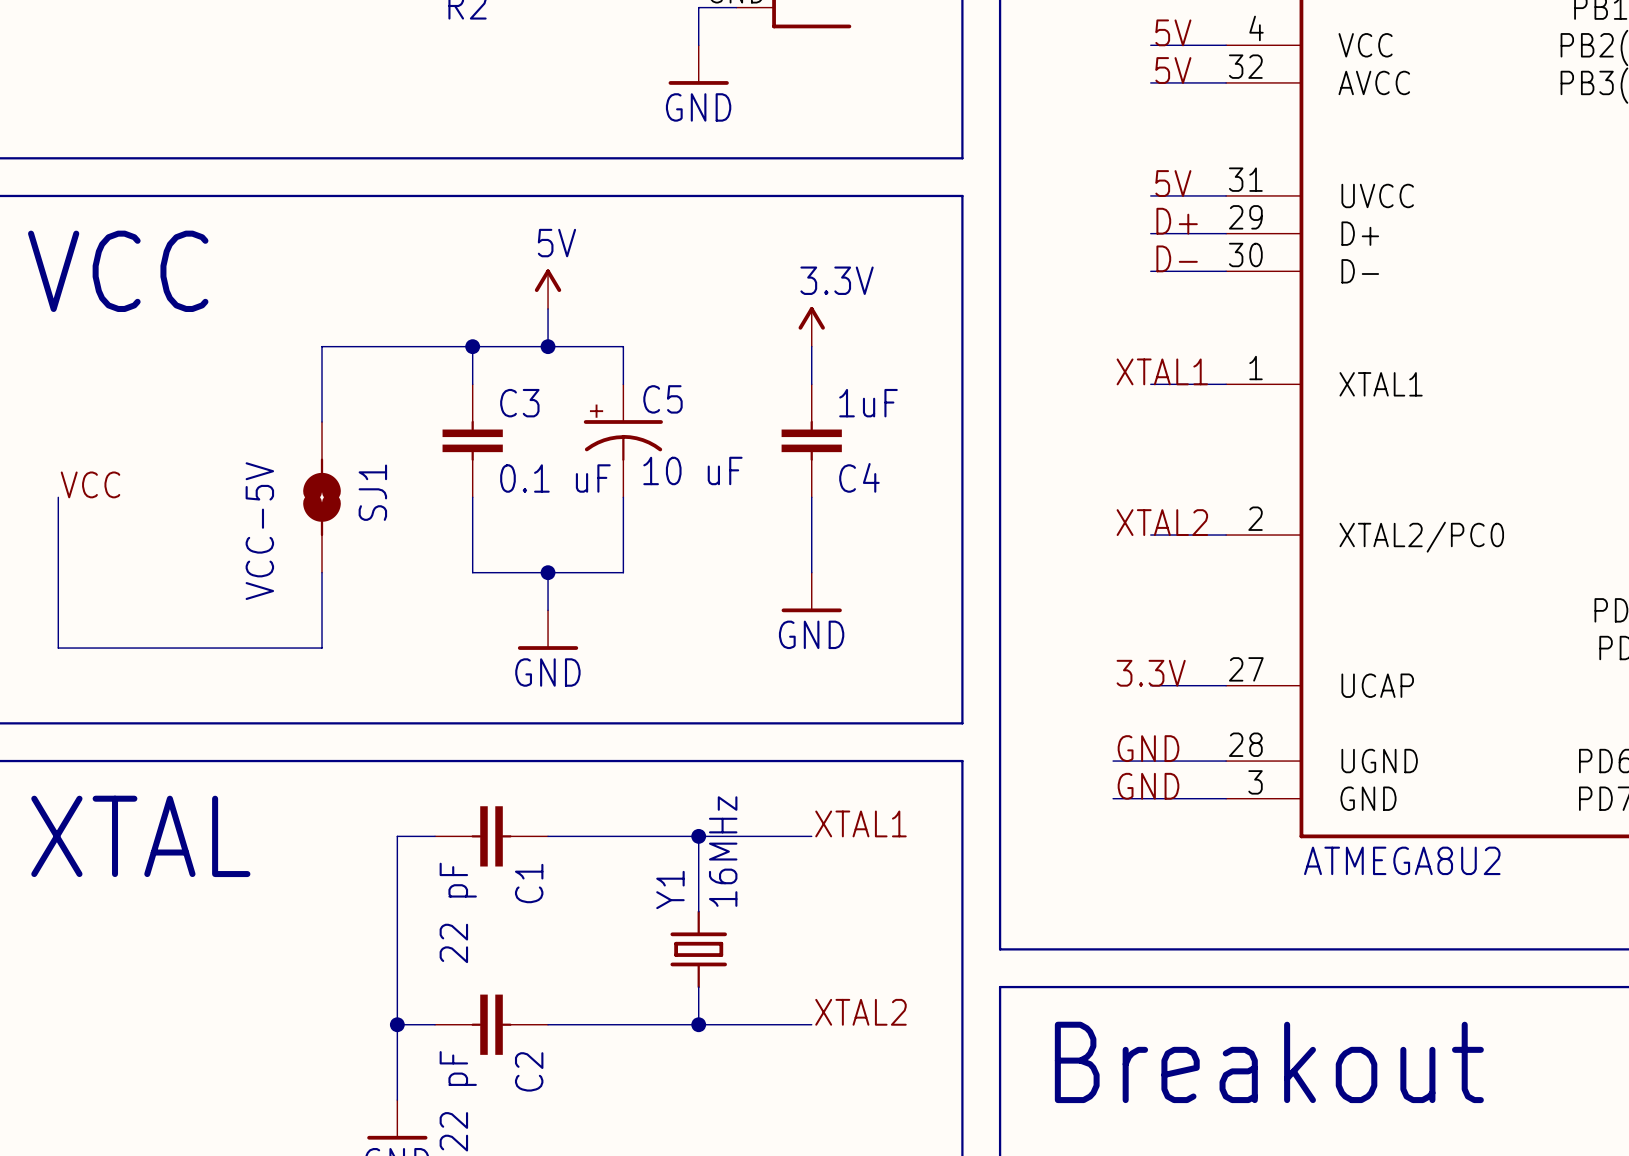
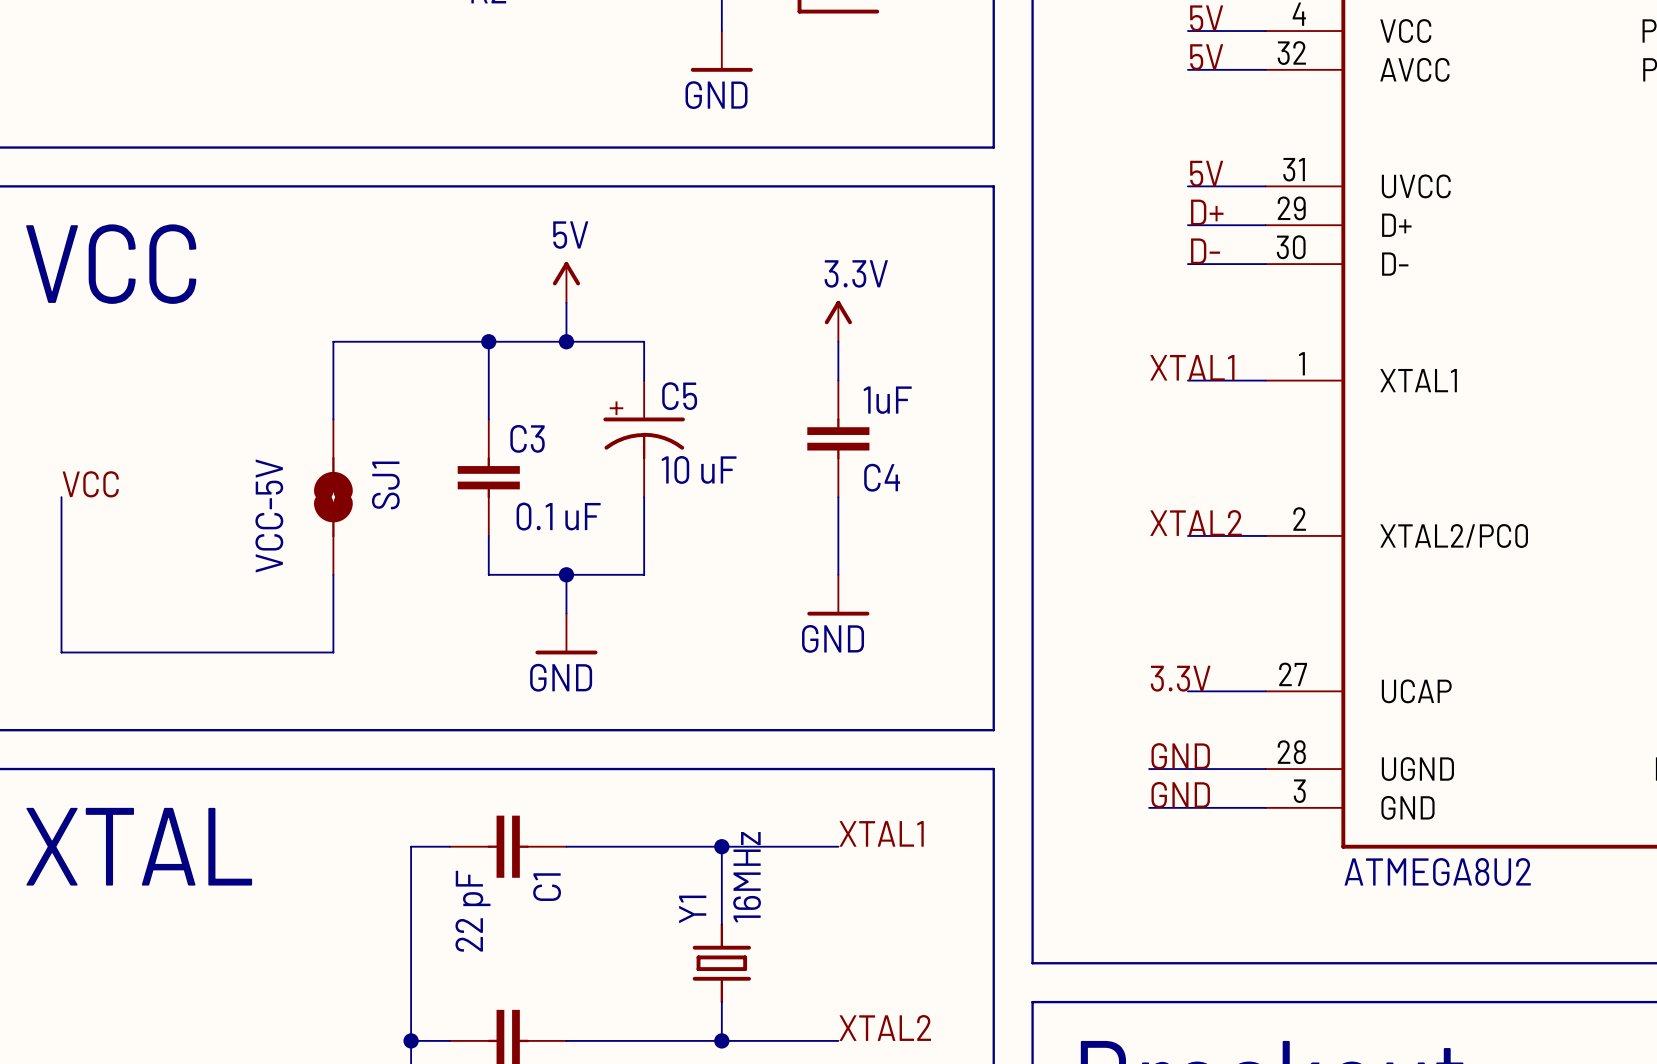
C3 name position: C3 (519, 403) -> C3 (527, 438)
C3 position: (472, 440) -> (488, 477)
C3 value position: 0.1 uF (555, 478) -> 0.1 uF (558, 516)

